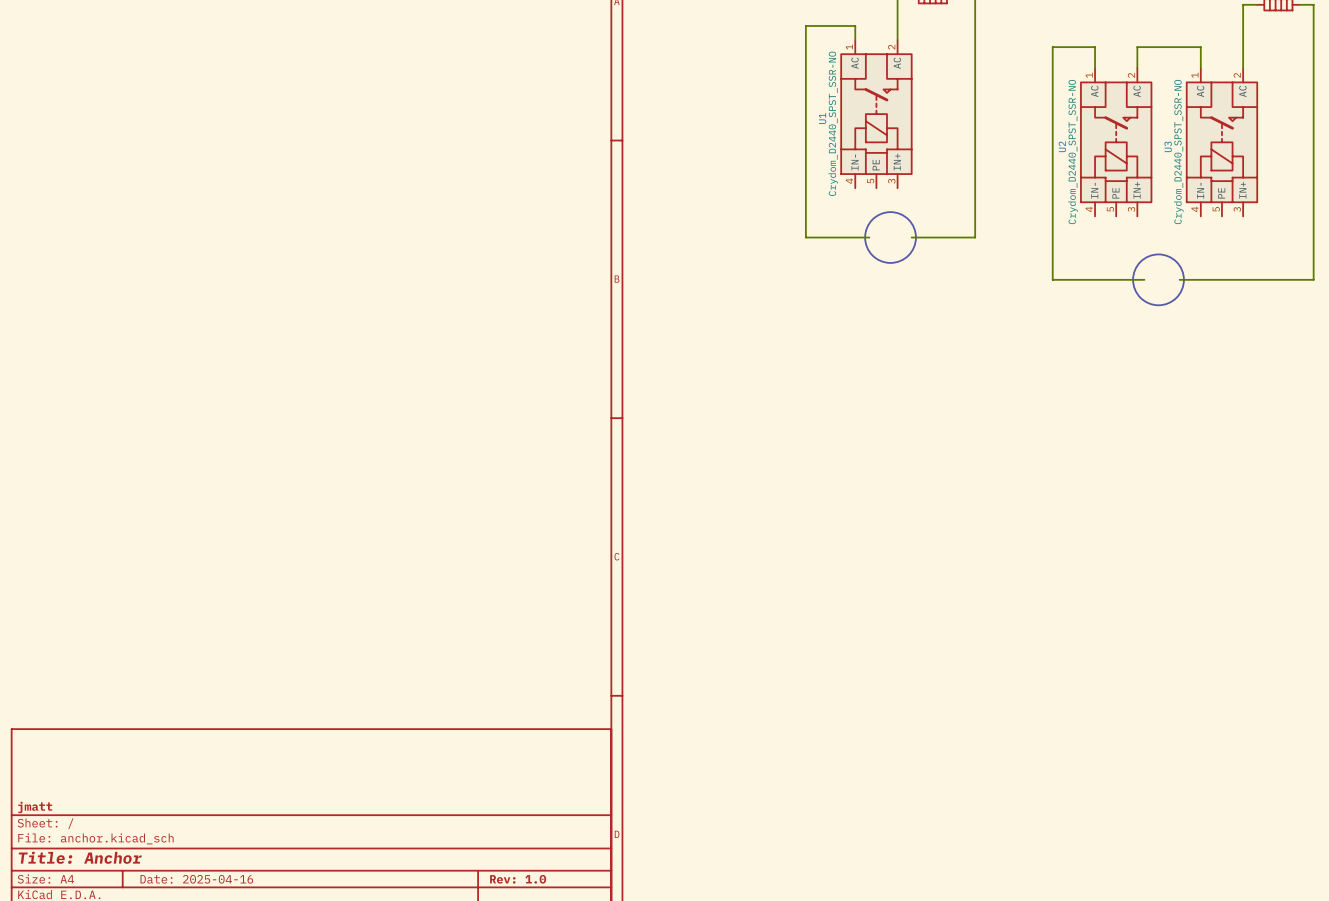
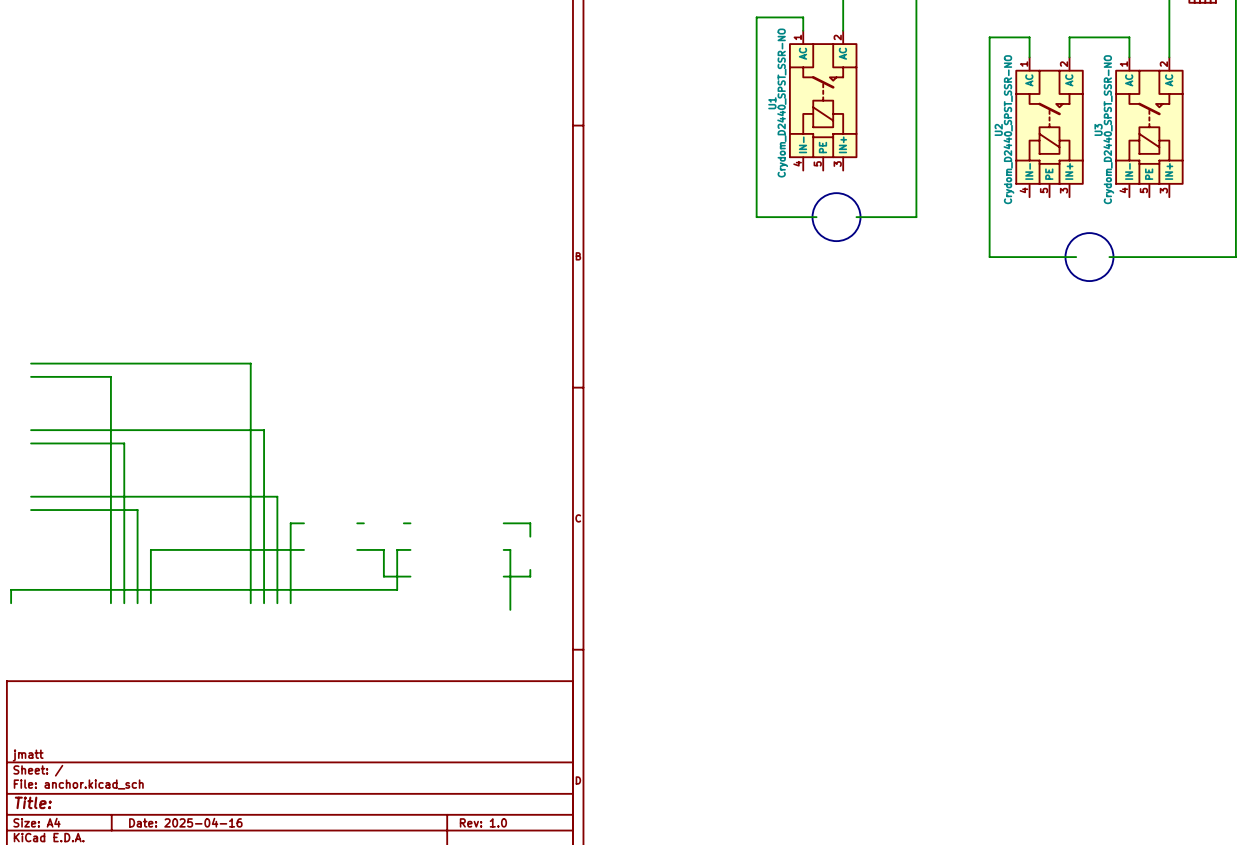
wire: none -> (31, 363) (250, 363) (250, 603)
wire: none -> (31, 376) (110, 376) (110, 603)
wire: none -> (31, 430) (264, 430) (264, 603)
wire: none -> (31, 443) (124, 443) (124, 603)
wire: none -> (31, 496) (277, 496) (277, 603)
wire: none -> (31, 510) (137, 510) (137, 603)
wire: none -> (303, 523) (290, 523) (290, 603)
wire: none -> (357, 523) (363, 523)
wire: none -> (403, 523) (410, 523)
wire: none -> (503, 523) (530, 523) (530, 536)
wire: none -> (303, 549) (150, 549) (150, 603)
wire: none -> (357, 549) (383, 549) (383, 576) (410, 576)
wire: none -> (410, 549) (397, 549) (397, 589) (11, 589) (11, 603)
wire: none -> (503, 549) (510, 549) (510, 609)
wire: none -> (530, 569) (530, 576) (503, 576)
title block: Title: Anchor (80, 857) -> Title: (33, 802)

